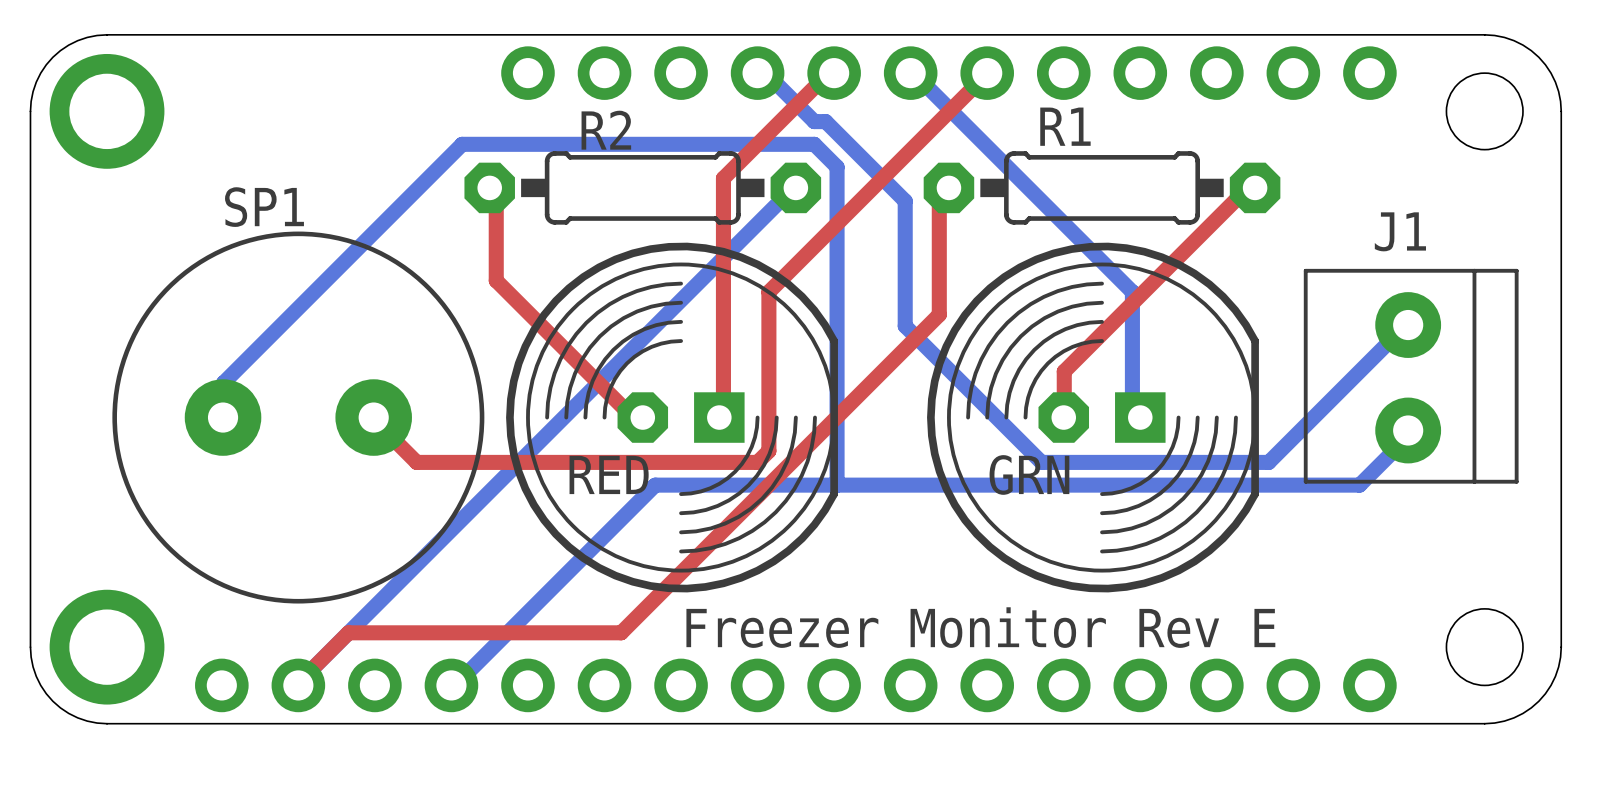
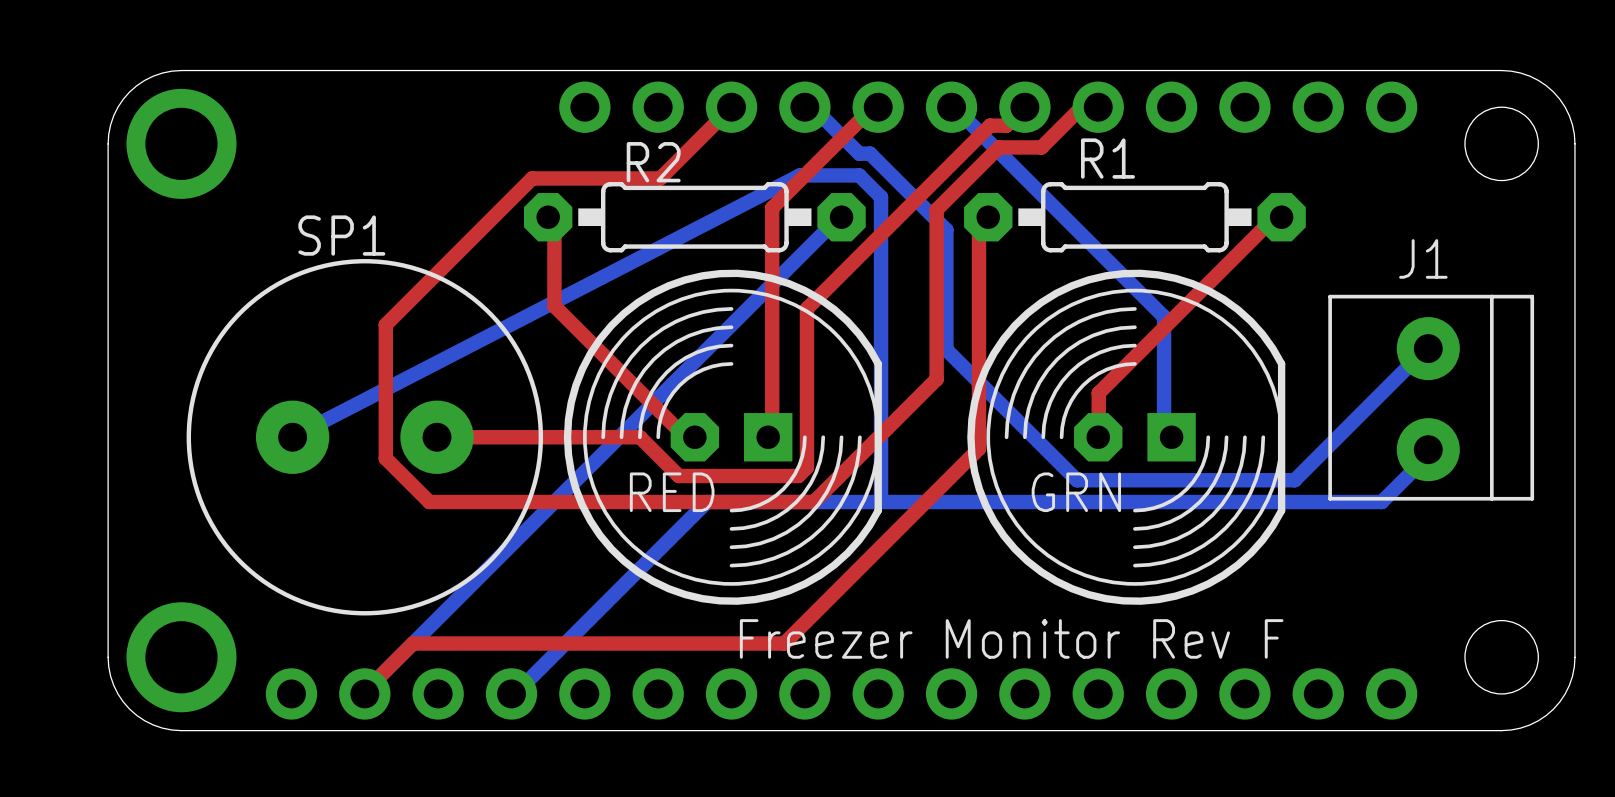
top track: none -> (731, 107) (660, 178) (532, 178) (385, 324) (385, 458) (429, 502) (813, 502) (936, 379) (936, 209) (999, 147) (1041, 147) (1081, 107) (1098, 107)
top track: (984, 76) (768, 292) (768, 451) (757, 462) (416, 462) (373, 417) -> (1024, 107) (1006, 125) (990, 125) (806, 308) (806, 467) (798, 476) (678, 476) (640, 437) (437, 437)
bottom track: (752, 144) (462, 144) (223, 382) (223, 417) (227, 383) -> (799, 175) (292, 437)
top track: (939, 314) (621, 632) -> (979, 338) (979, 448) (784, 643) (674, 643)
text: Freezer Monitor Rev E (980, 627) -> Freezer Monitor Rev F (1011, 638)

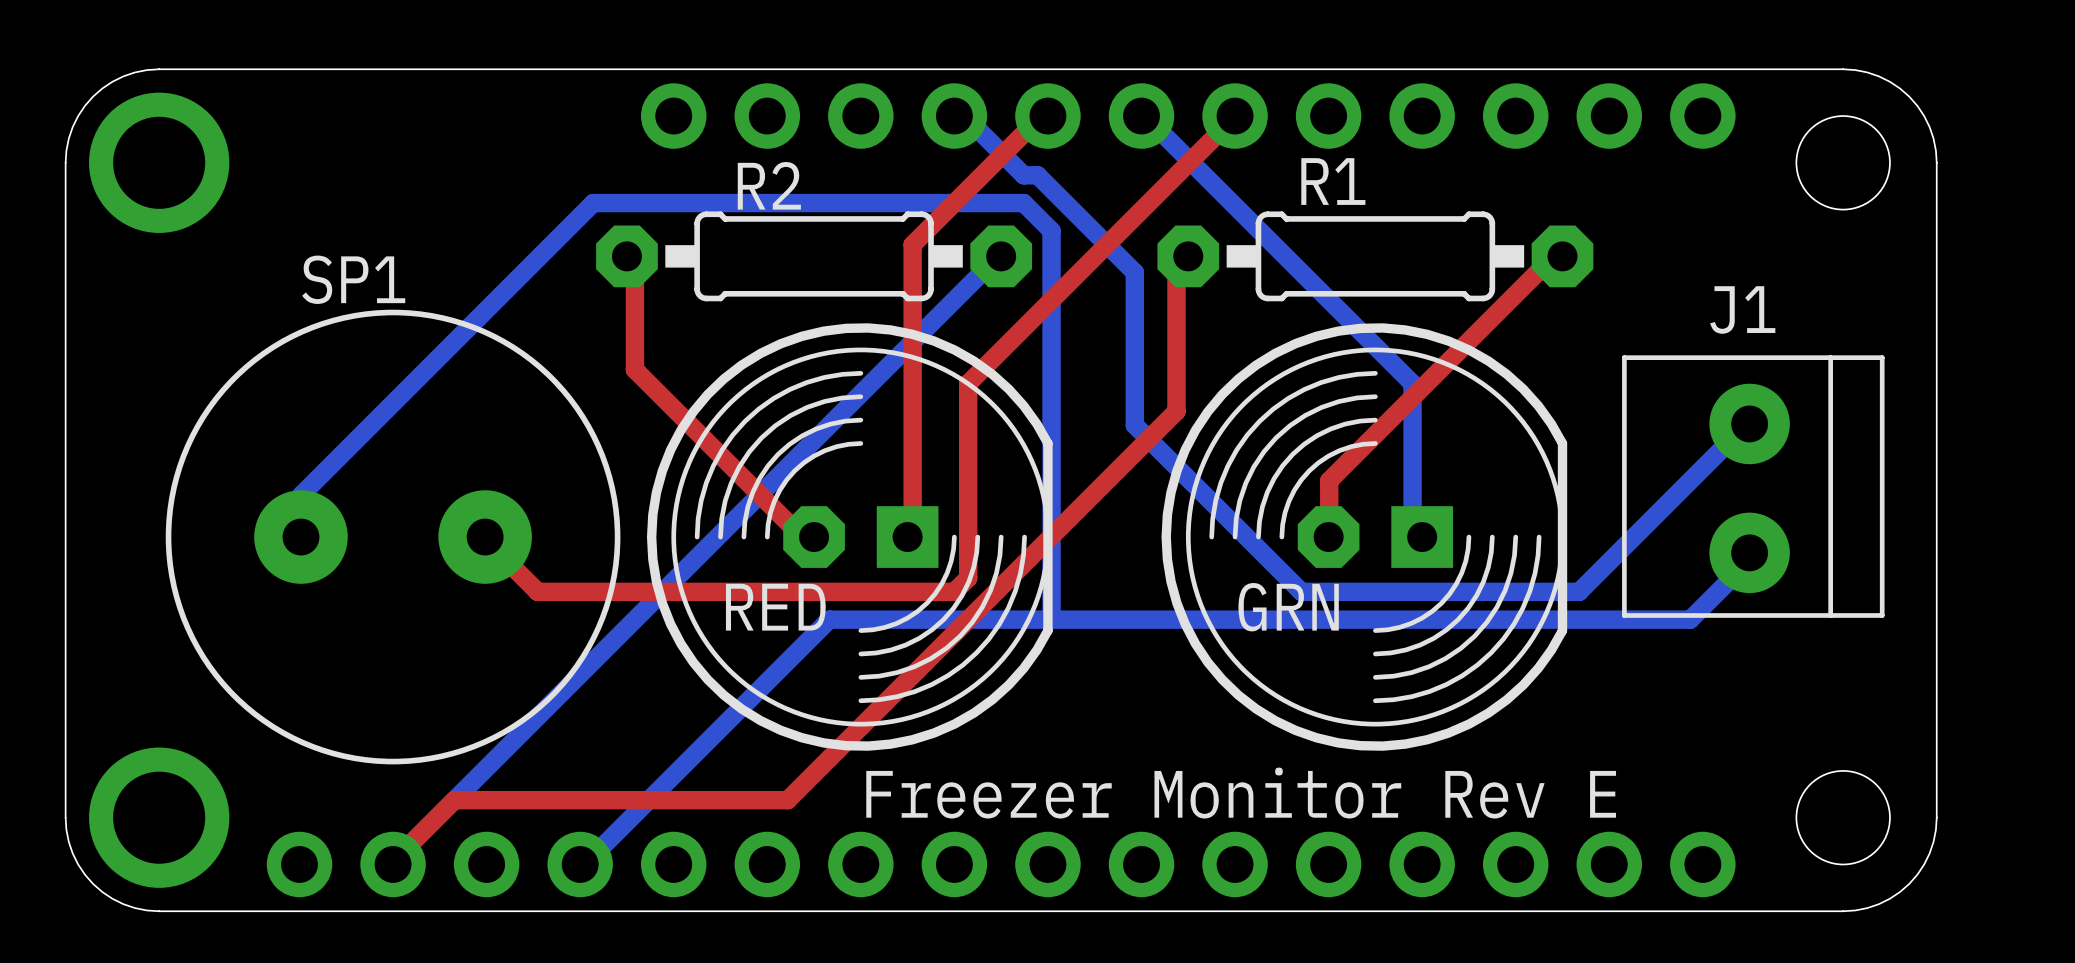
top track: (731, 107) (660, 178) (532, 178) (385, 324) (385, 458) (429, 502) (813, 502) (936, 379) (936, 209) (999, 147) (1041, 147) (1081, 107) (1098, 107) -> none
top track: (1024, 107) (1006, 125) (990, 125) (806, 308) (806, 467) (798, 476) (678, 476) (640, 437) (437, 437) -> (1232, 119) (968, 383) (968, 577) (954, 591) (537, 591) (485, 537)
bottom track: (799, 175) (292, 437) -> (947, 203) (593, 203) (301, 494) (300, 537) (306, 494)
top track: (979, 338) (979, 448) (784, 643) (674, 643) -> (1176, 411) (787, 800)
text: Freezer Monitor Rev F (1011, 638) -> Freezer Monitor Rev E (1241, 793)

